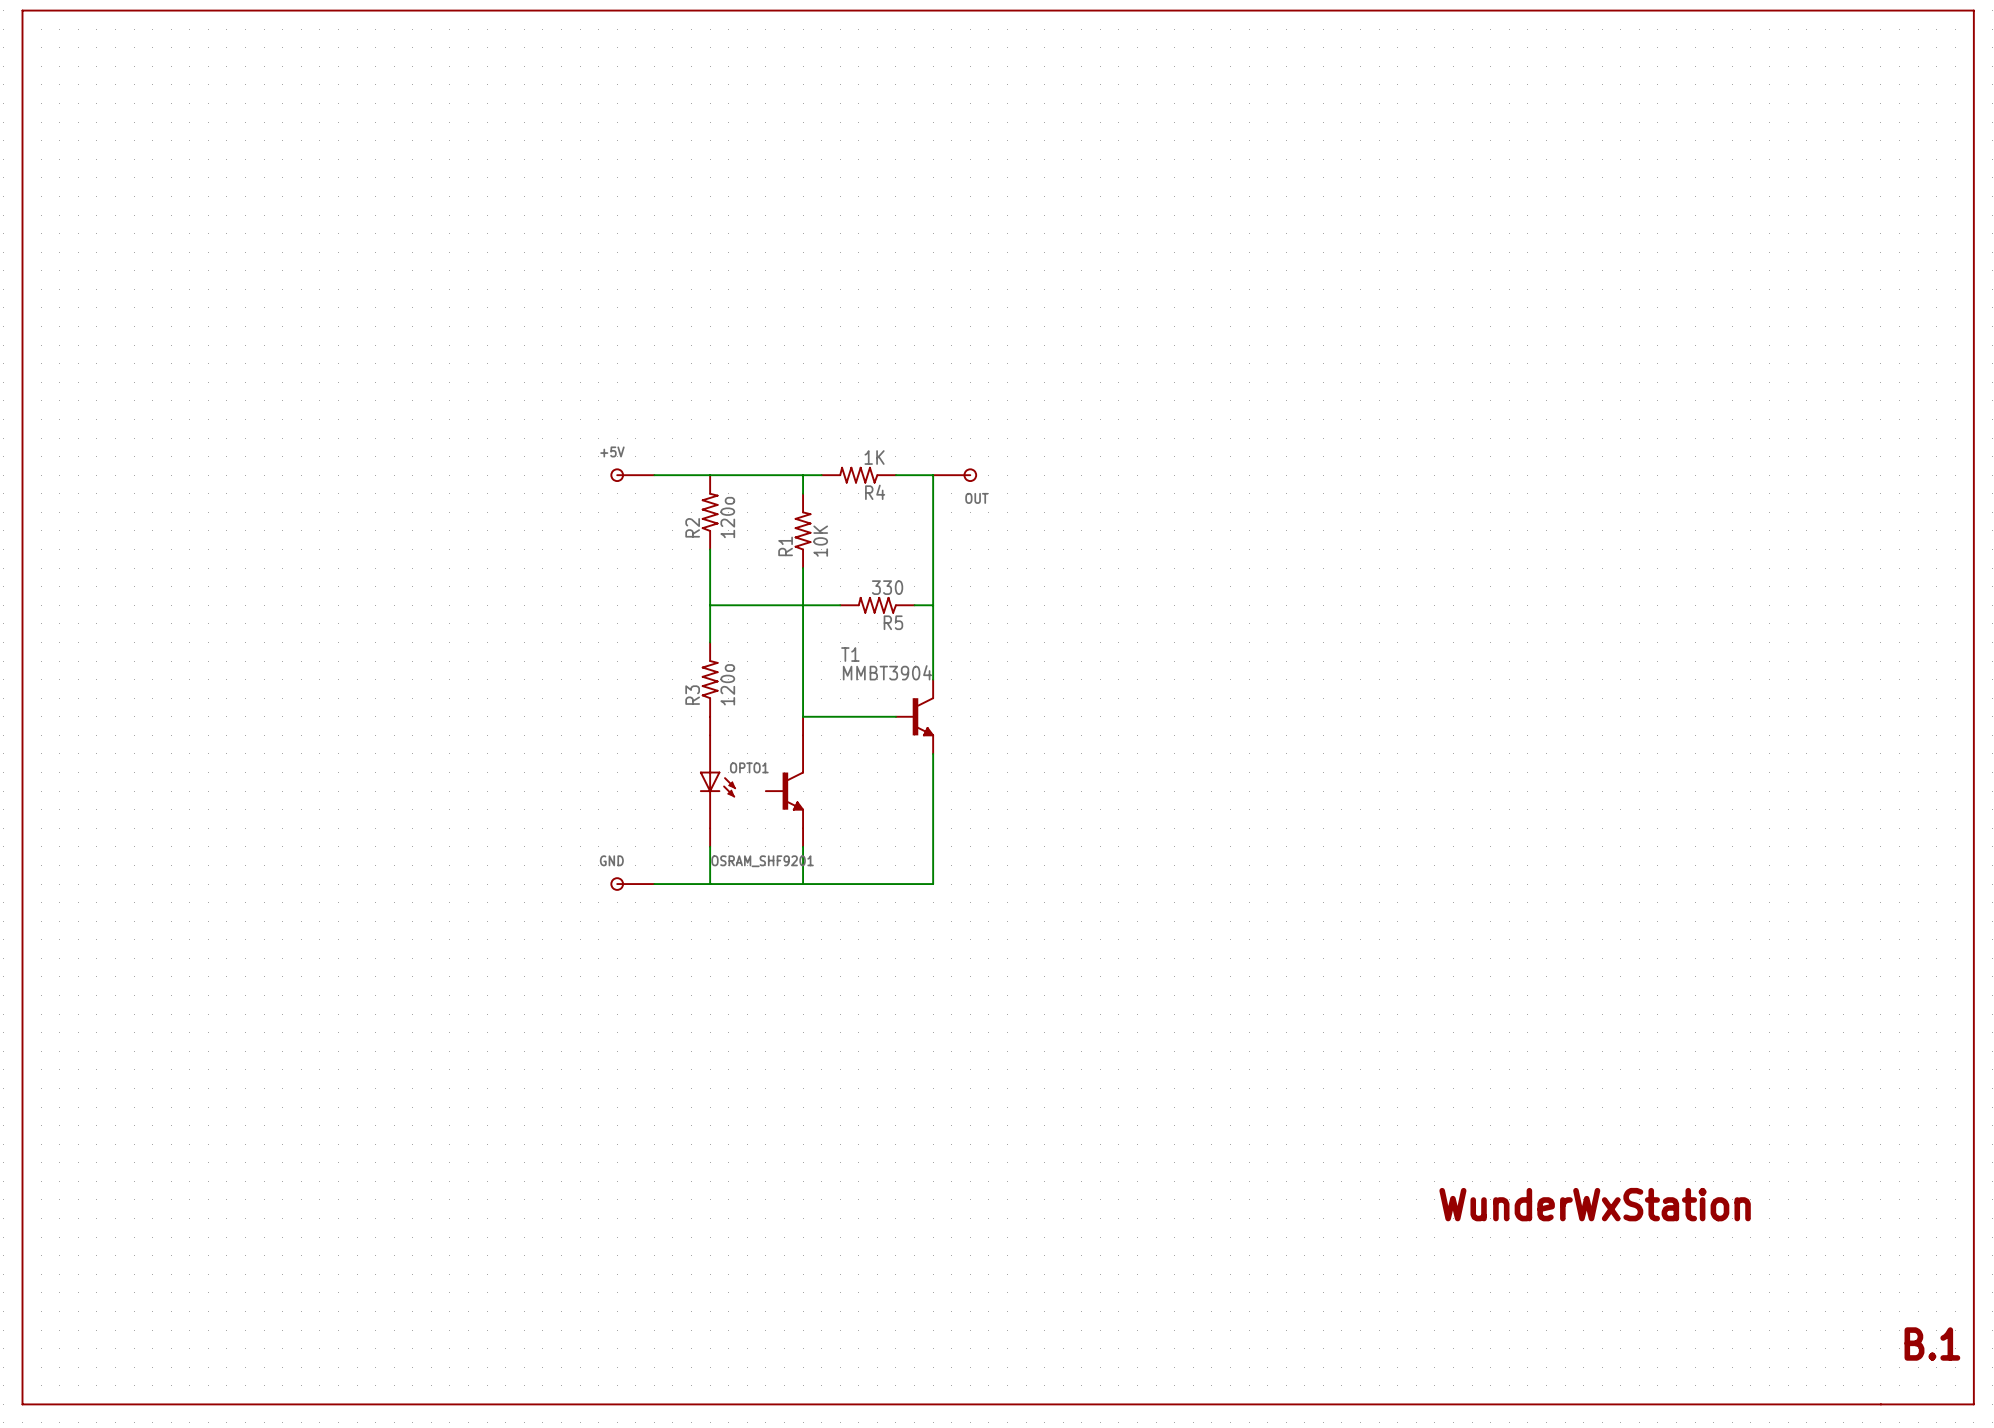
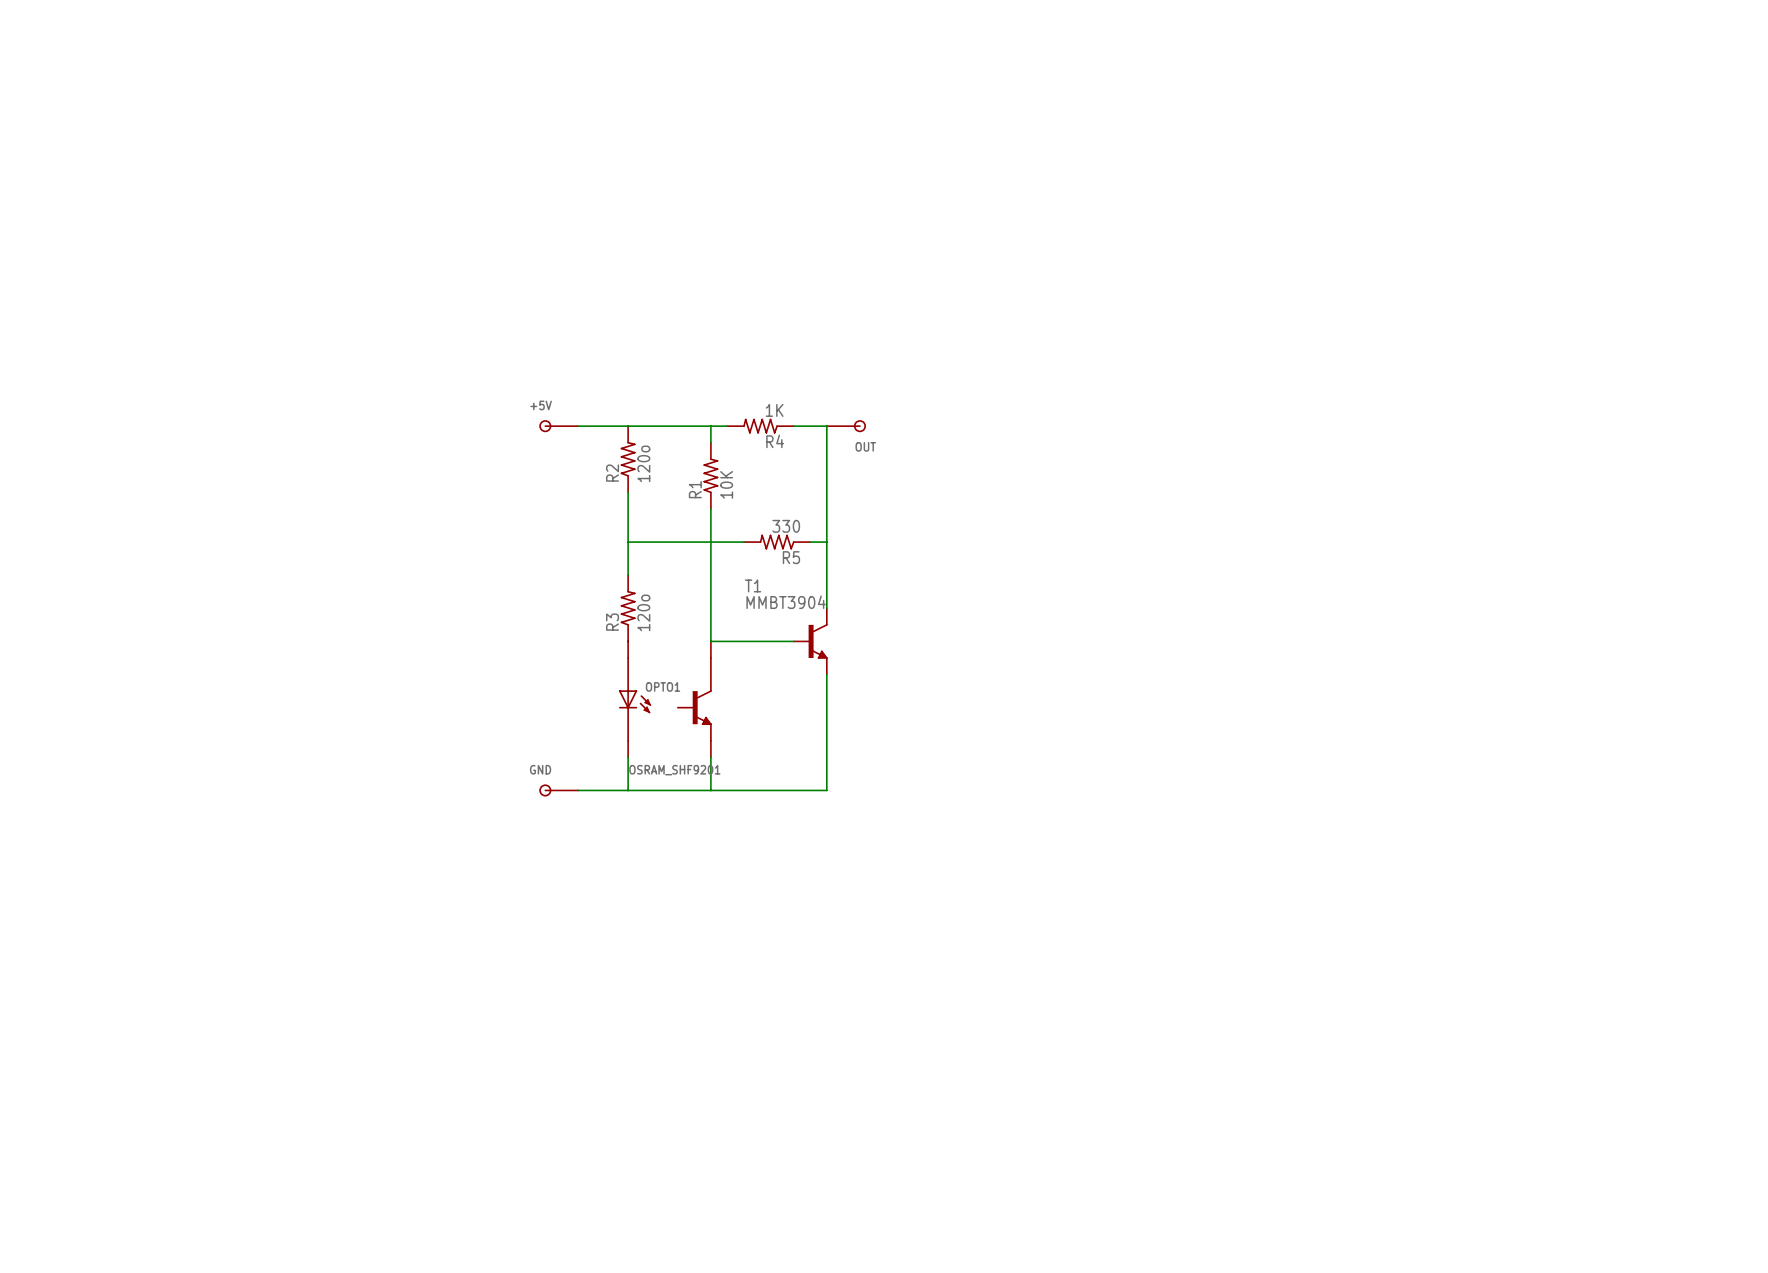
part: (998, 707) -> none
text: WunderWxStation (1595, 1204) -> none
text: B.1 (1932, 1344) -> none

